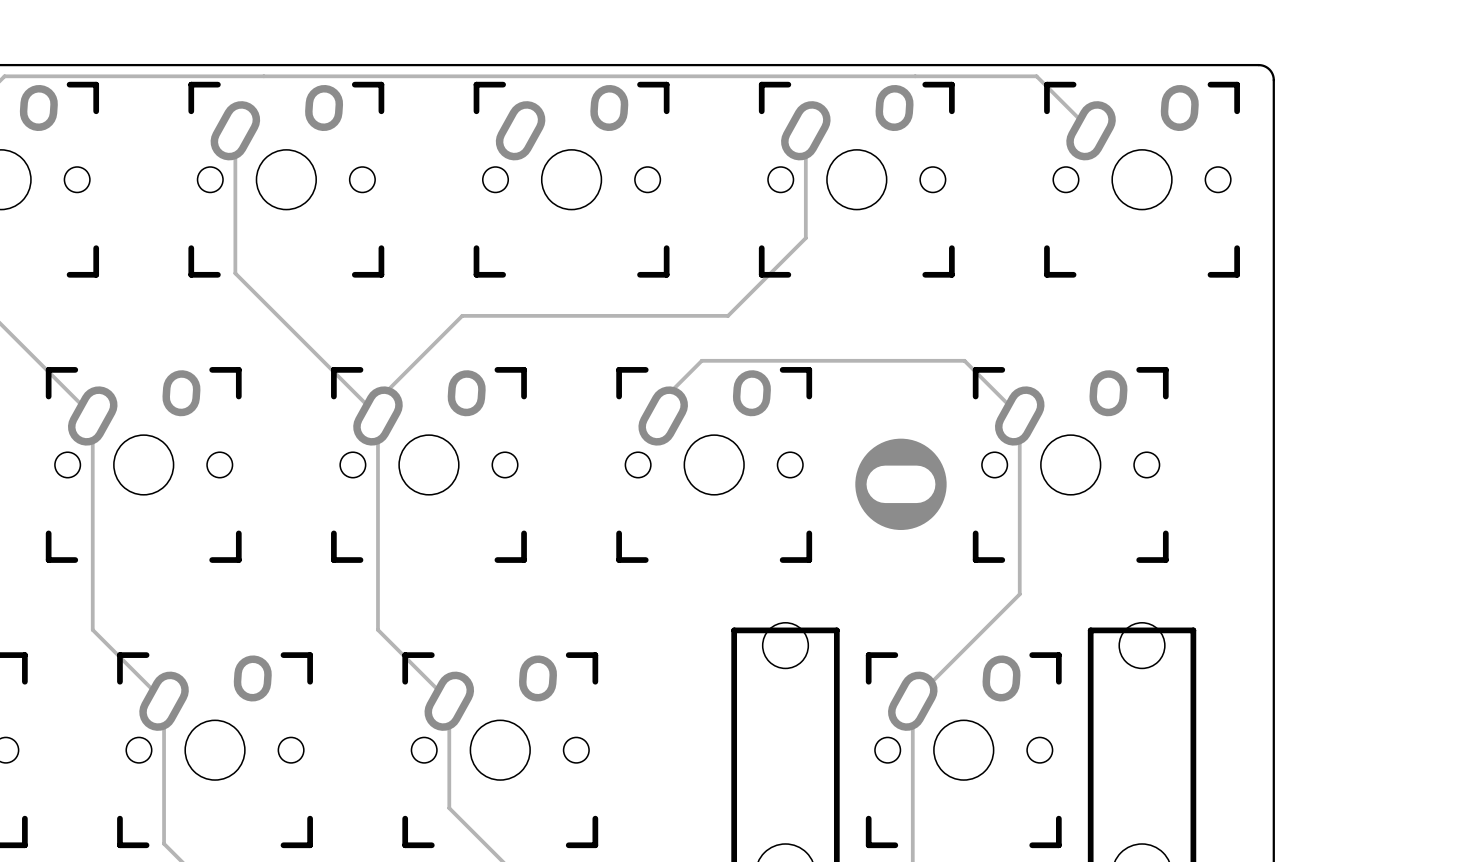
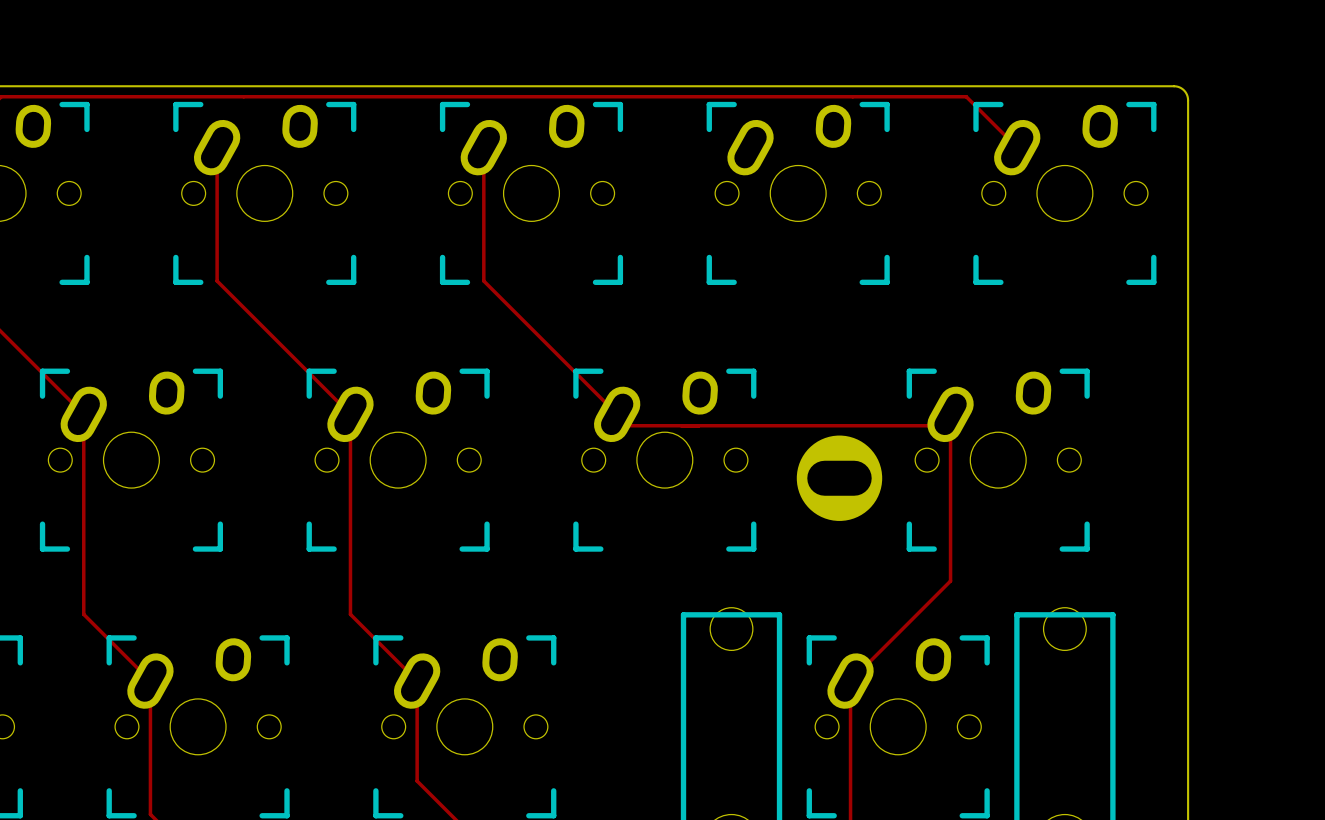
track: (805, 130) (805, 238) (728, 315) (462, 315) (377, 400) (377, 415) -> none
track: (663, 415) (663, 399) (701, 360) (964, 360) (1019, 415) -> (483, 147) (483, 281) (628, 425) (939, 425) (950, 414)

